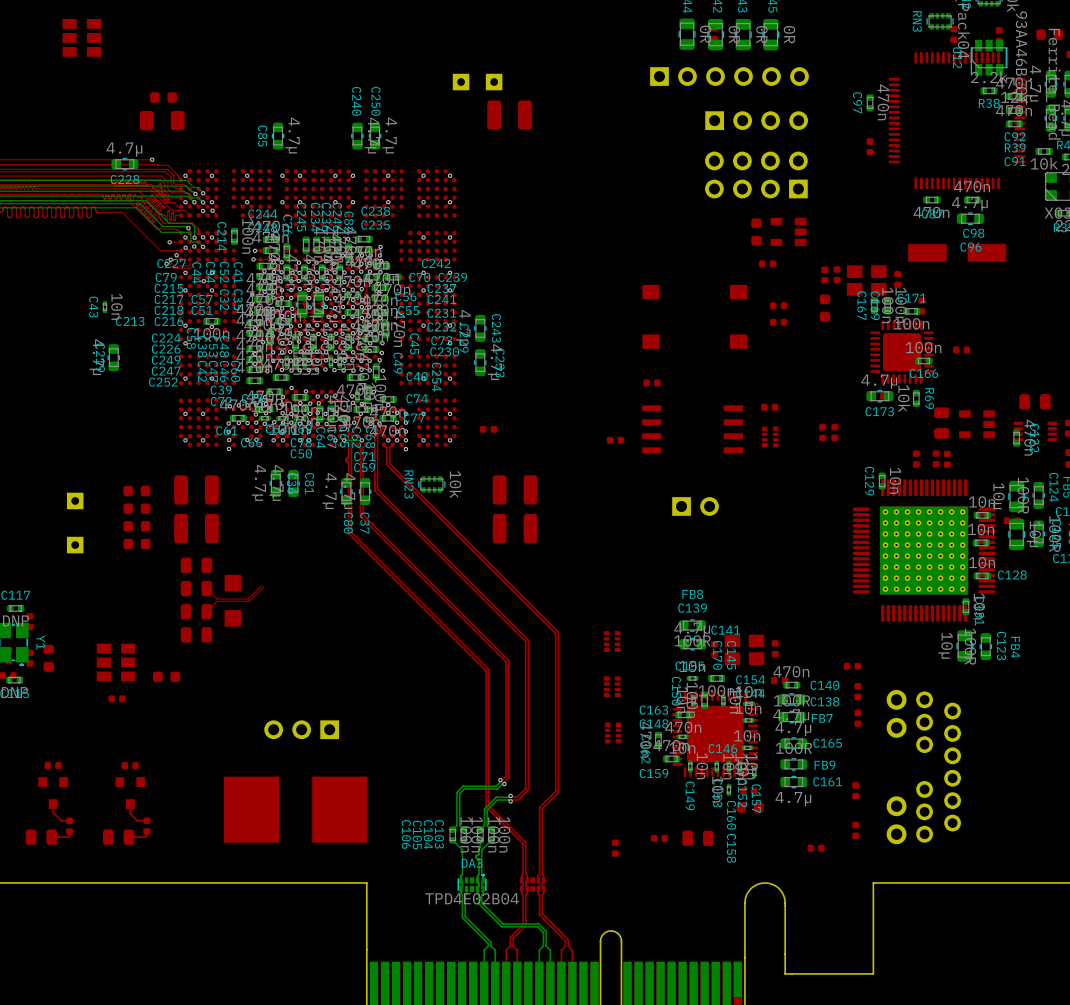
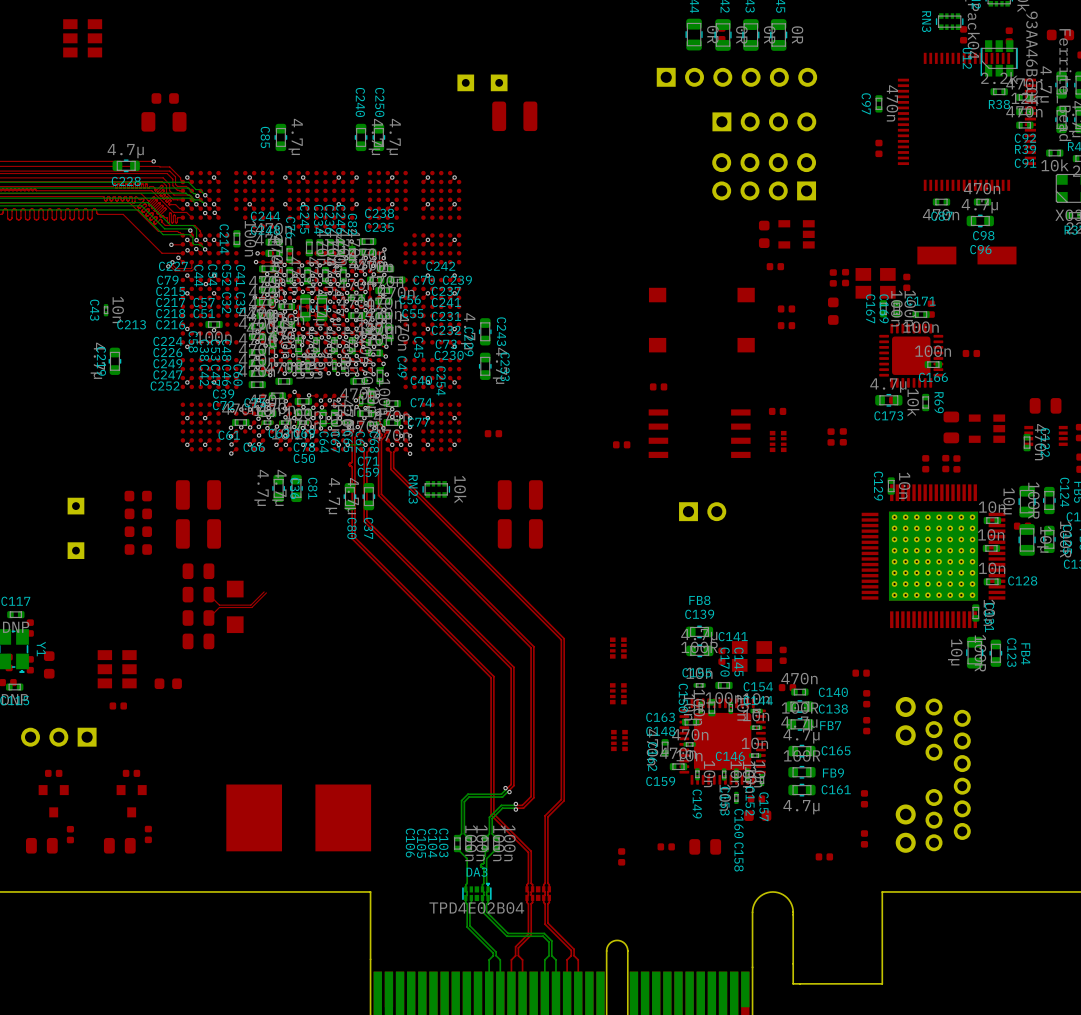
part position: (301, 729) -> (58, 737)
top track: (53, 804) (53, 812) (61, 820) (69, 820) -> none
top track: (130, 804) (130, 813) (137, 820) (146, 820) -> none
top track: (69, 831) (68, 837) (51, 837) -> none
top track: (146, 831) (145, 837) (128, 837) -> none

